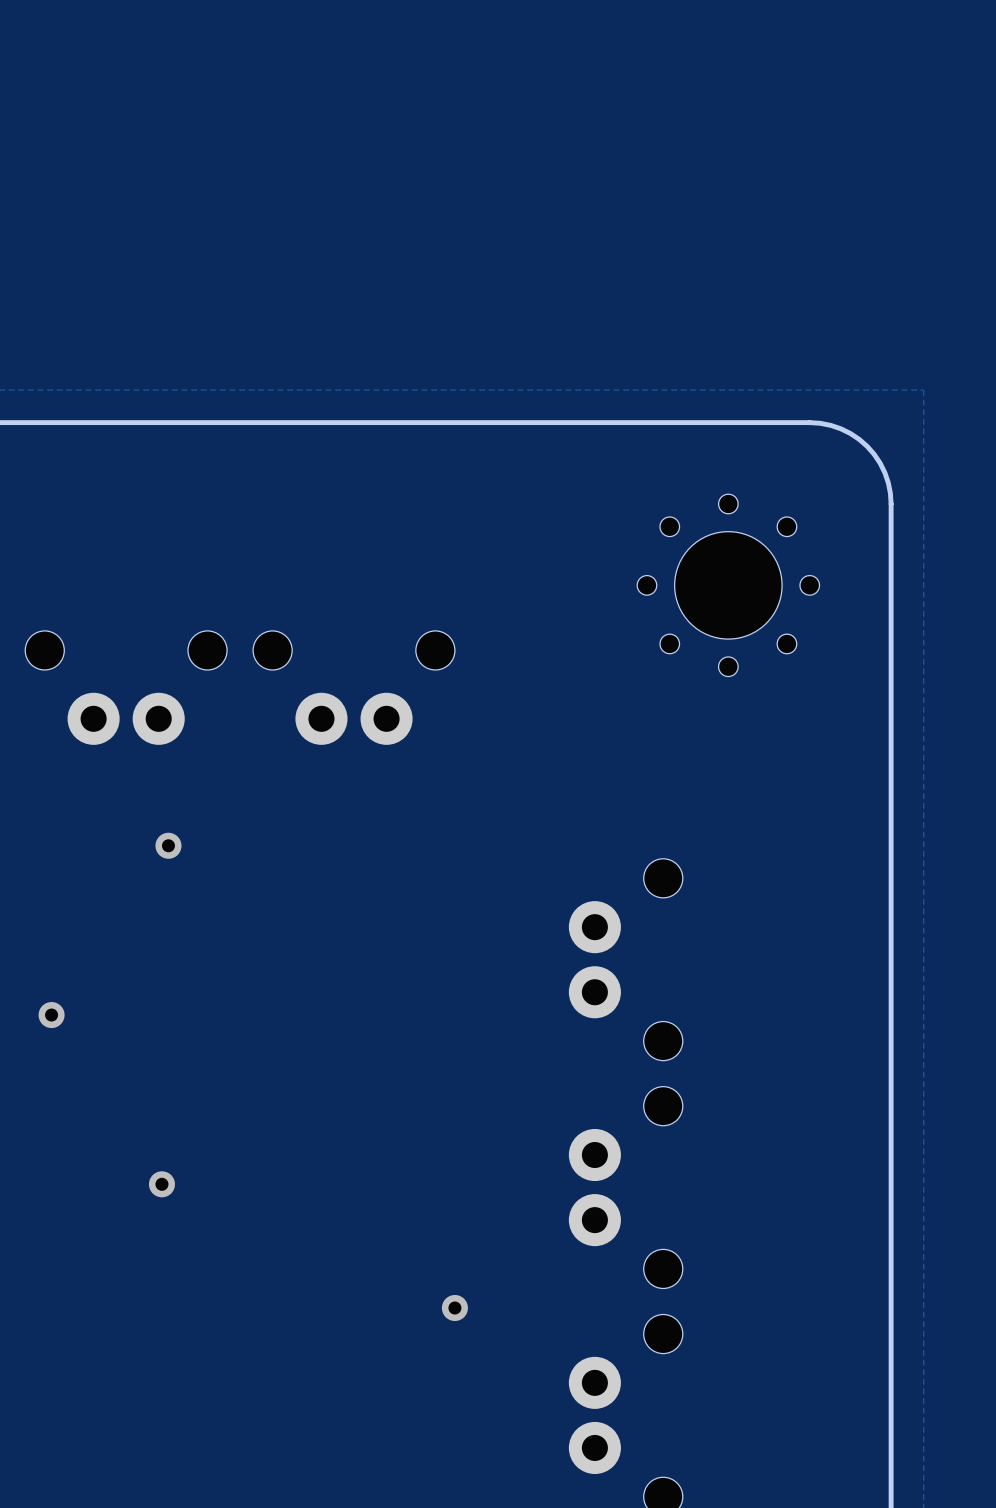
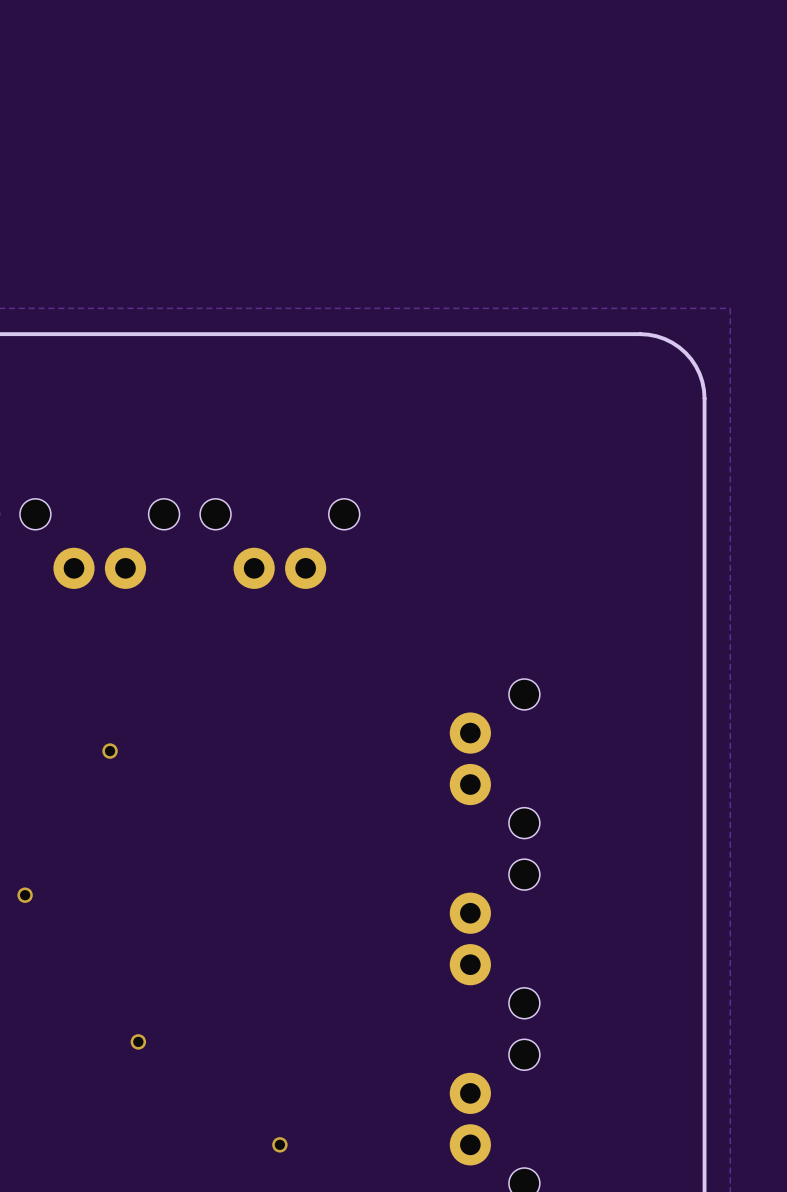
part: (728, 585) -> none
via: (168, 845) -> none
via: none -> (110, 751)
via: (51, 1015) -> none
via: none -> (25, 895)
via: (161, 1184) -> none
via: (454, 1308) -> none
via: none -> (138, 1041)
via: none -> (279, 1144)

